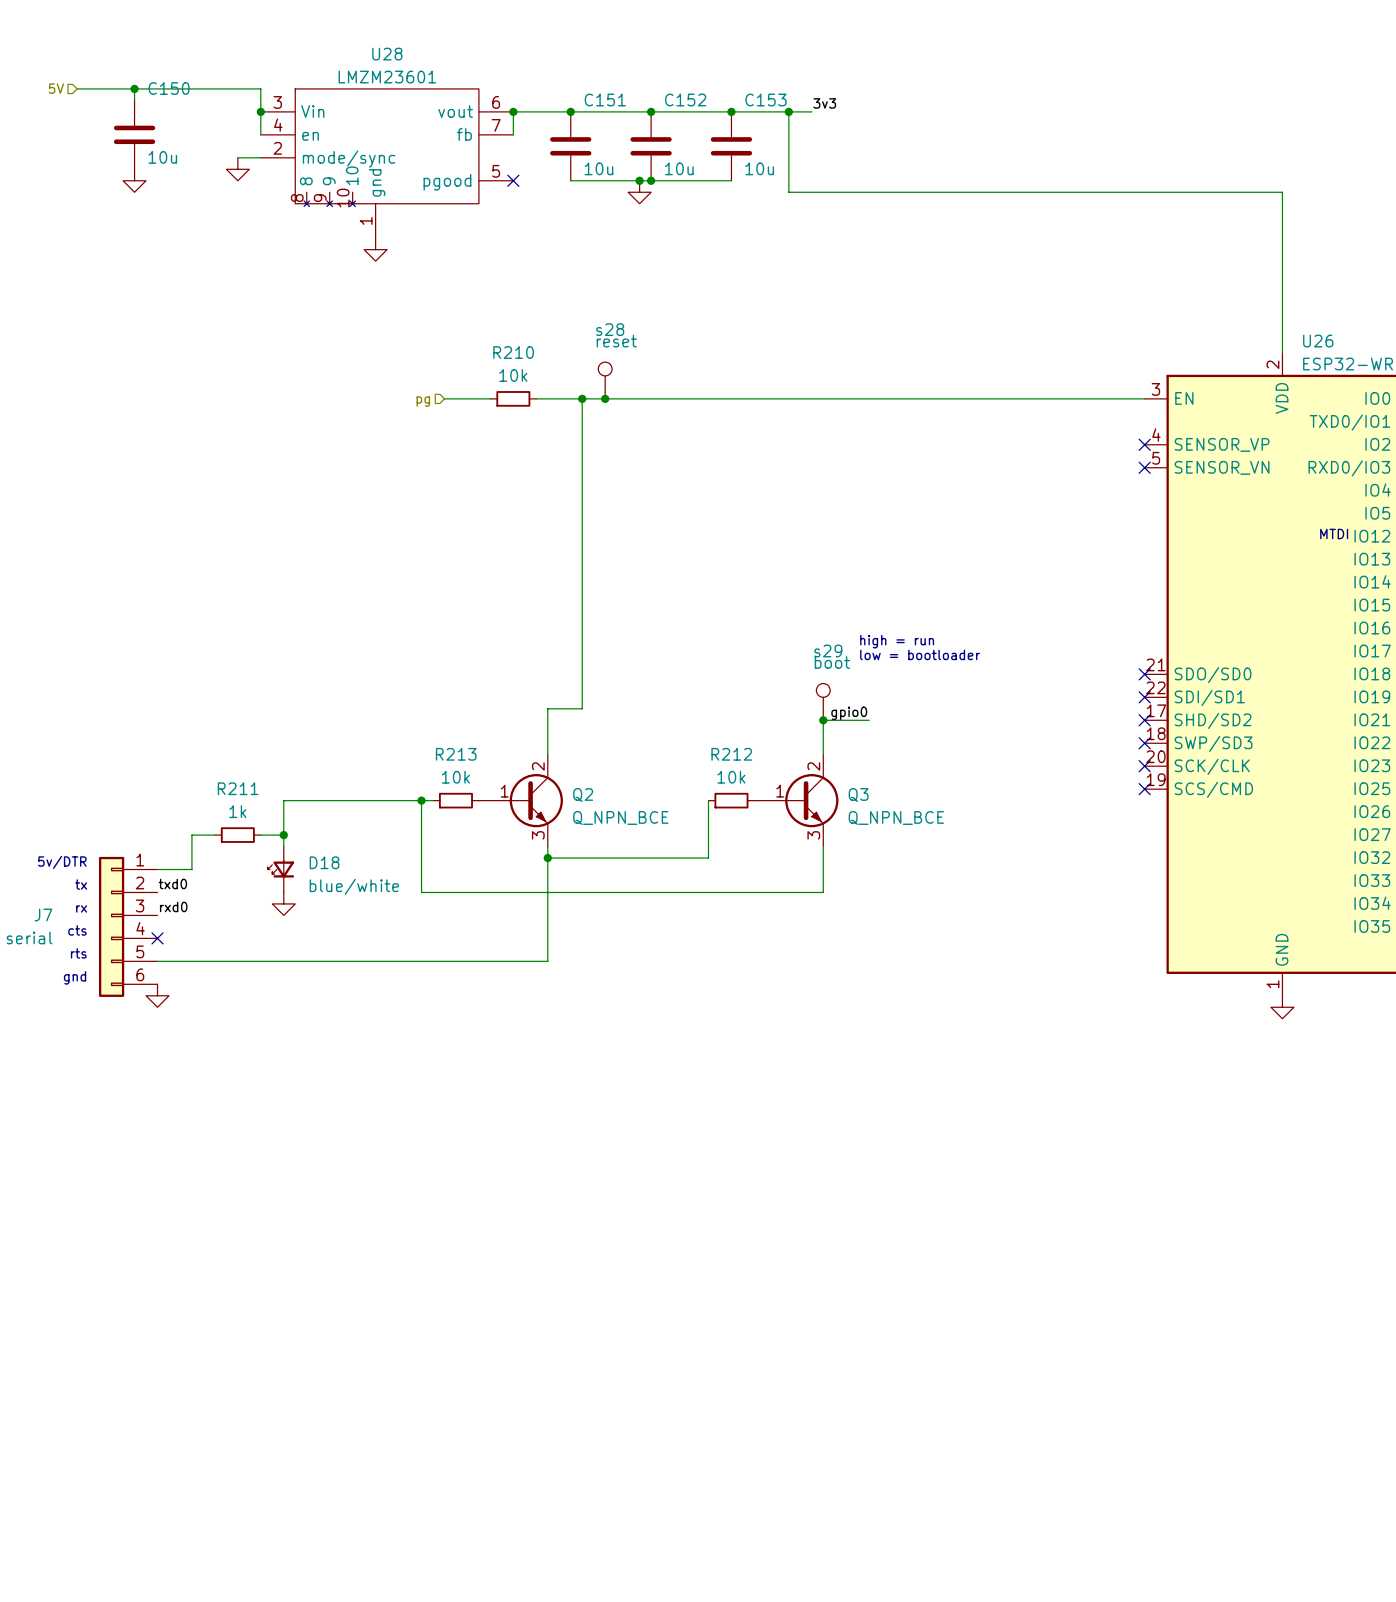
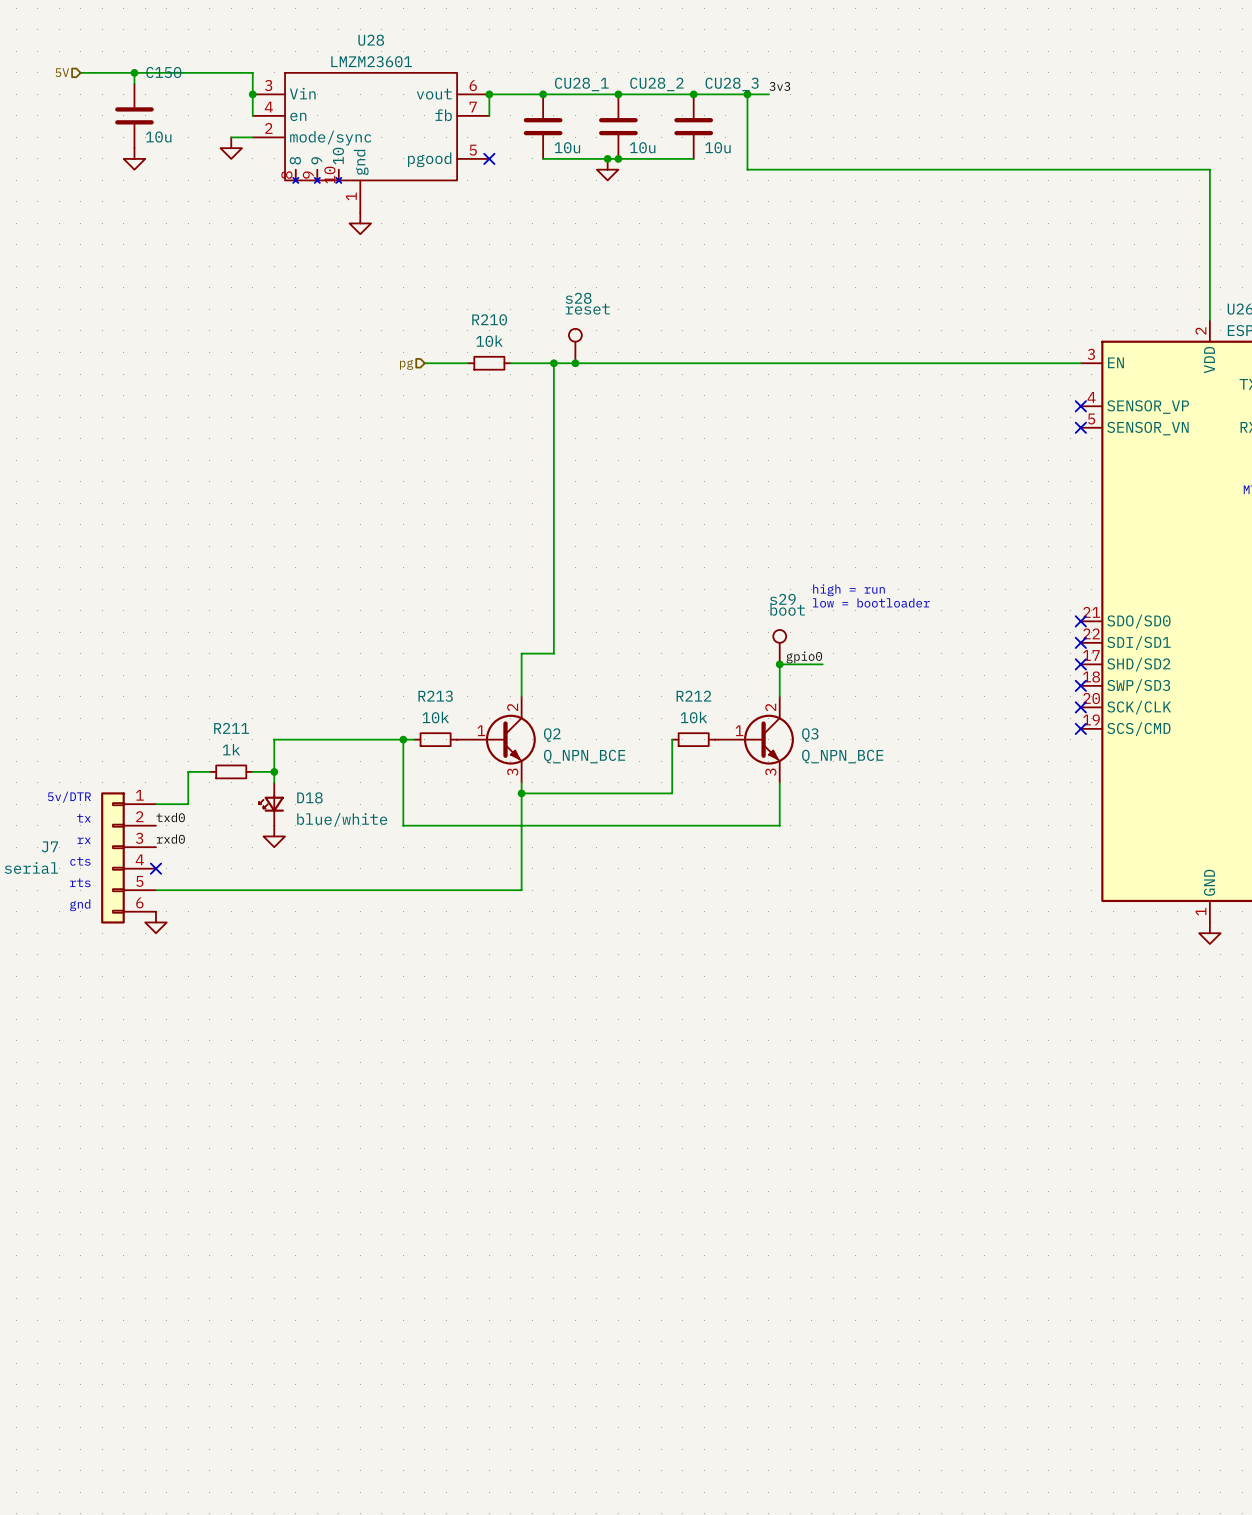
C151 name: C151 (605, 100) -> CU28_1 (581, 84)
C152 name: C152 (685, 100) -> CU28_2 (656, 84)
C153 name: C153 (765, 100) -> CU28_3 (732, 84)

